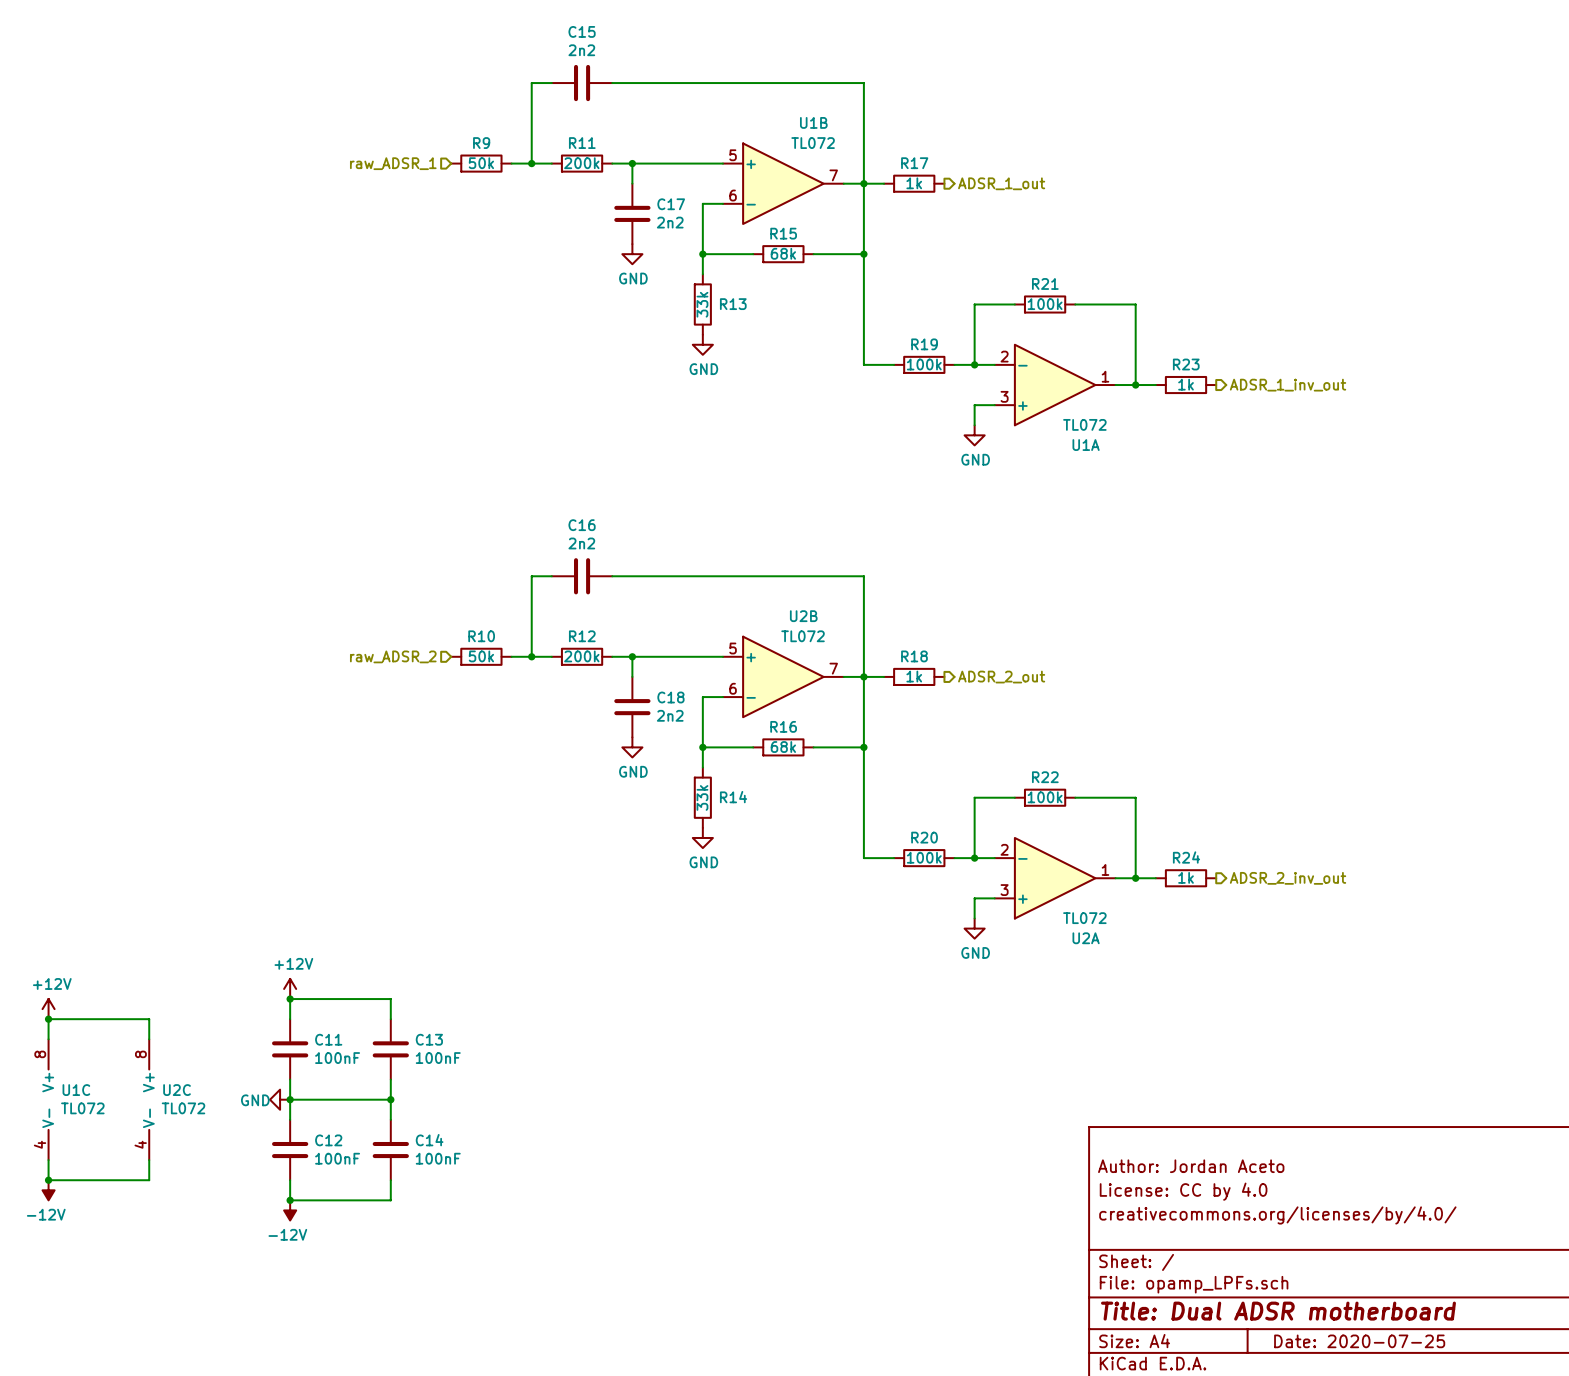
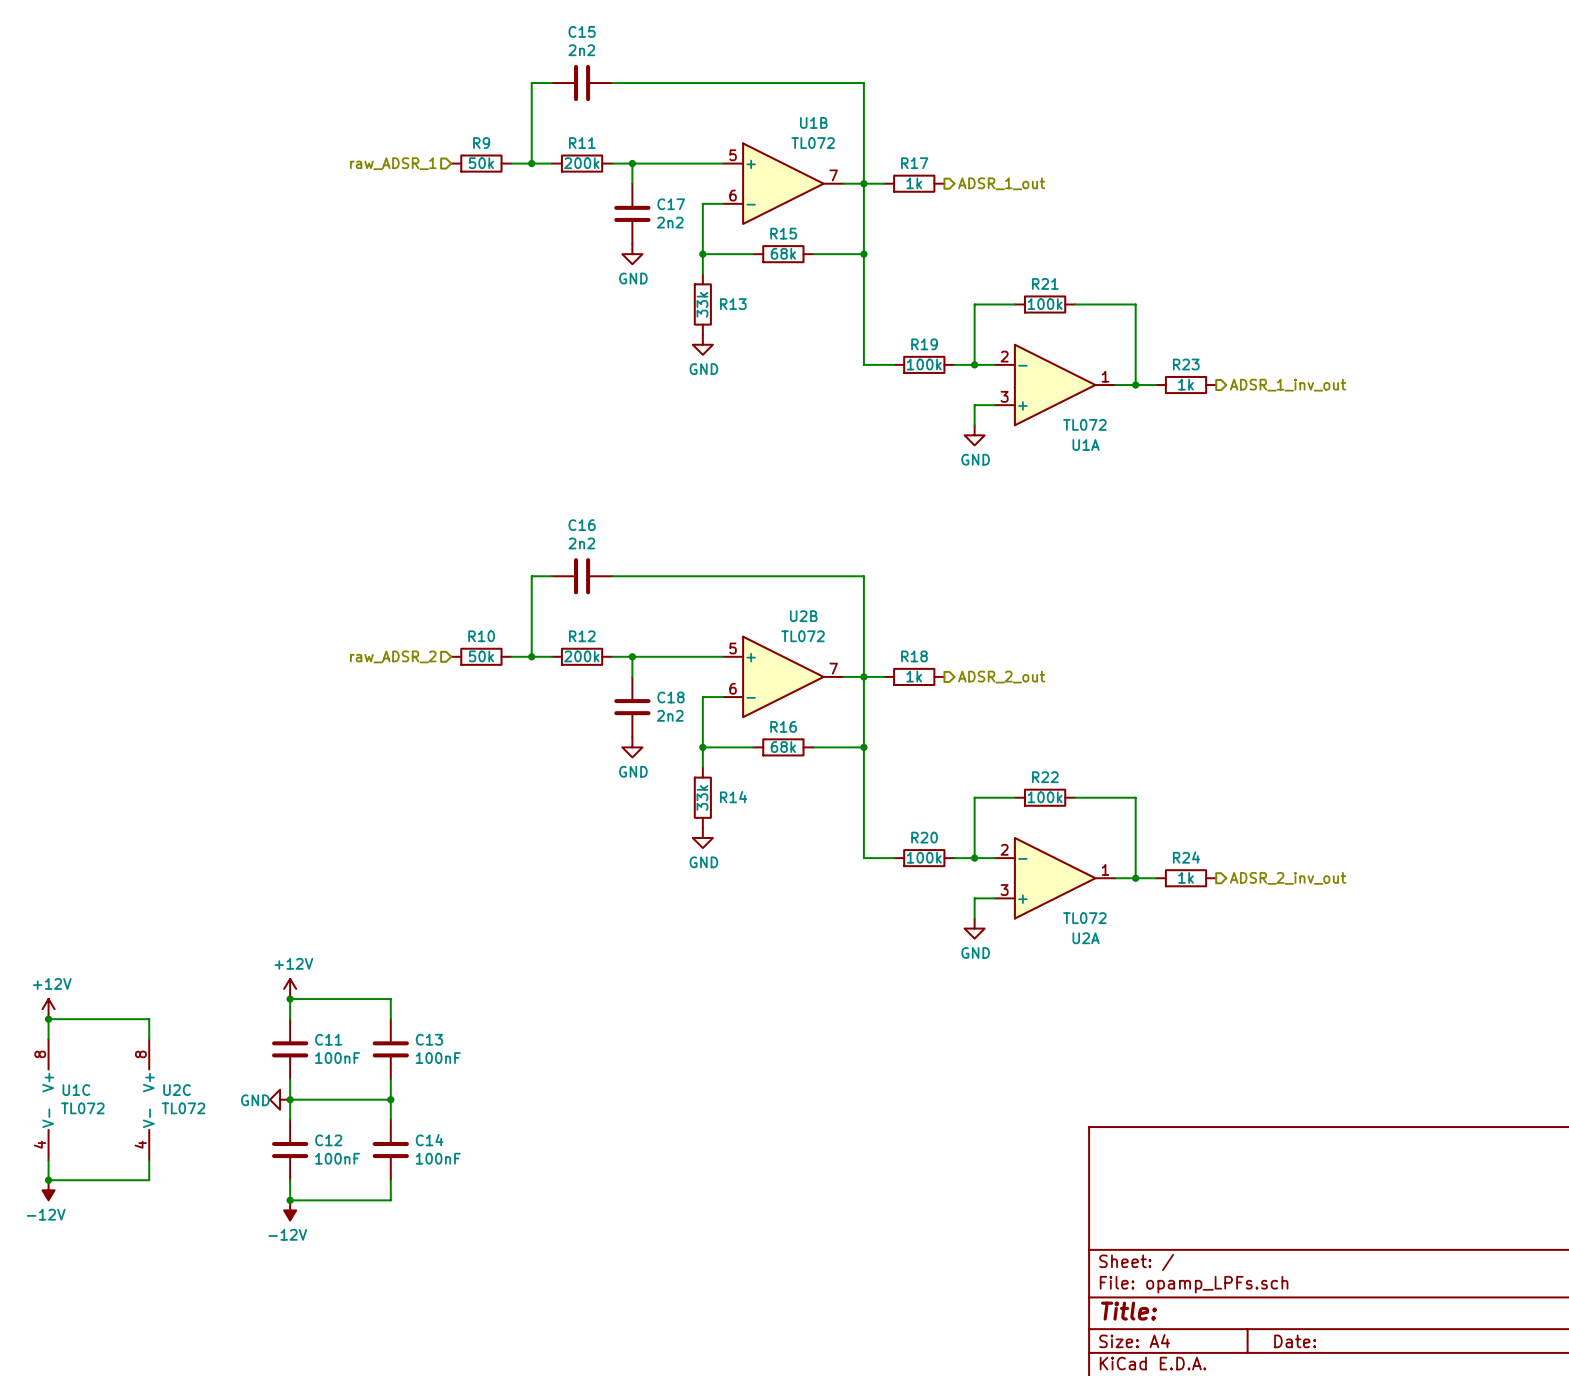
title block: Author: Jordan Aceto (1191, 1166) -> none
title block: License: CC by 4.0 (1183, 1191) -> none
title block: creativecommons.org/licenses/by/4.0/ (1277, 1215) -> none
title block: Title: Dual ADSR motherboard (1278, 1311) -> Title: (1128, 1311)
title block: Date: 2020-07-25 (1359, 1341) -> Date: (1295, 1341)

